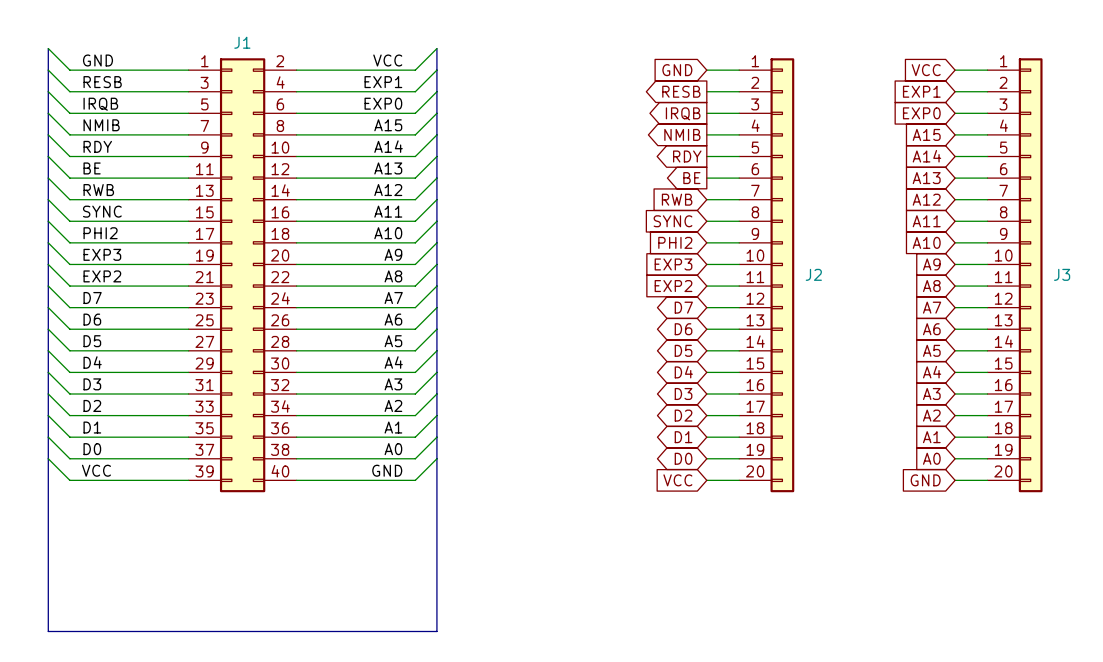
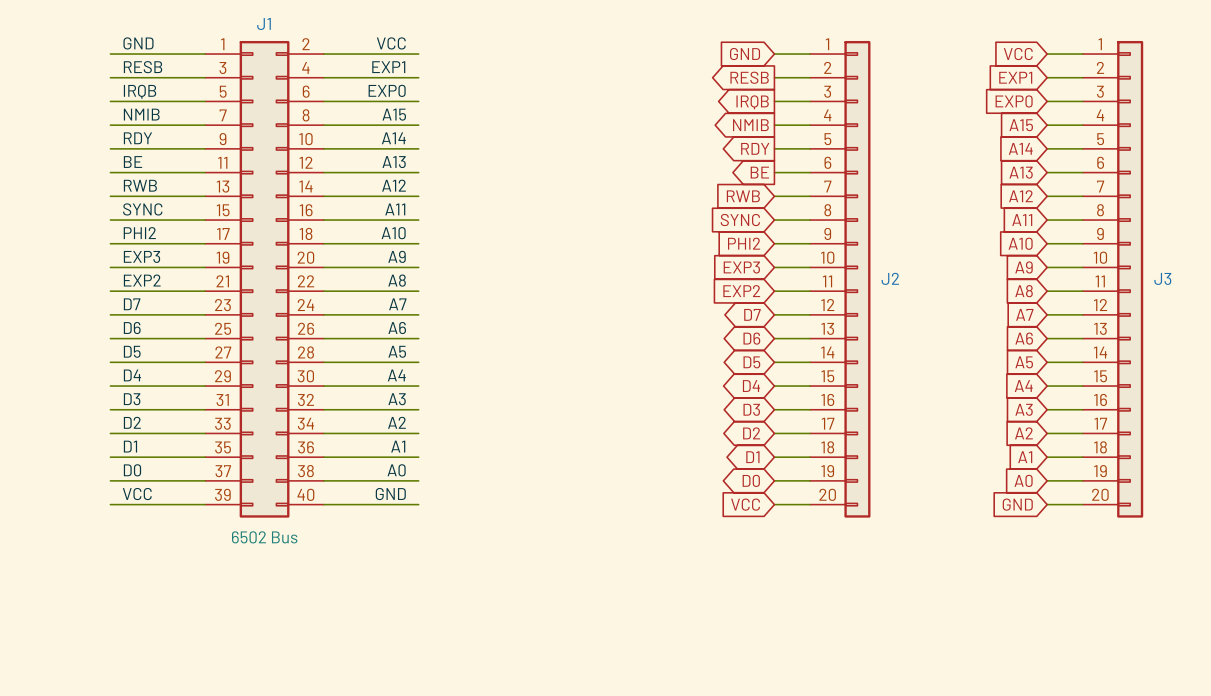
wire: (48, 48) (69, 70) (102, 70) -> none
bus: (48, 48) (48, 631) (436, 631) (436, 48) -> none
wire: (436, 48) (415, 70) (382, 70) -> none
label position: GND (97, 60) -> GND (138, 43)
label position: VCC (387, 60) -> VCC (391, 43)
wire: (48, 70) (69, 91) (102, 91) -> none
wire: (436, 70) (415, 91) (382, 91) -> none
label position: RESB (102, 82) -> RESB (143, 67)
label position: EXP1 (383, 82) -> EXP1 (388, 67)
wire: (48, 91) (69, 113) (102, 113) -> none
wire: (436, 91) (415, 113) (382, 113) -> none
label position: EXP0 (383, 103) -> EXP0 (387, 90)
label position: IRQB (100, 104) -> IRQB (140, 91)
wire: (48, 113) (69, 134) (102, 134) -> none
wire: (436, 113) (415, 134) (382, 134) -> none
label position: NMIB (101, 125) -> NMIB (141, 114)
label position: A15 (388, 125) -> A15 (394, 114)
wire: (48, 134) (69, 156) (102, 156) -> none
wire: (436, 134) (415, 156) (382, 156) -> none
label position: RDY (97, 146) -> RDY (137, 138)
label position: A14 (388, 146) -> A14 (393, 138)
wire: (48, 156) (69, 178) (102, 178) -> none
wire: (436, 156) (415, 178) (382, 178) -> none
label position: BE (92, 168) -> BE (133, 162)
label position: A13 (388, 168) -> A13 (394, 162)
wire: (48, 178) (69, 199) (102, 199) -> none
wire: (436, 178) (415, 199) (382, 199) -> none
label position: RWB (98, 190) -> RWB (140, 185)
label position: A12 (388, 190) -> A12 (393, 185)
wire: (48, 199) (69, 221) (102, 221) -> none
wire: (436, 199) (415, 221) (382, 221) -> none
label position: SYNC (102, 211) -> SYNC (142, 209)
label position: A11 (388, 211) -> A11 (395, 209)
wire: (48, 221) (69, 242) (102, 242) -> none
wire: (436, 221) (415, 242) (382, 242) -> none
label position: PHI2 (100, 233) -> PHI2 (139, 233)
label position: A10 (388, 233) -> A10 (393, 233)
wire: (48, 242) (69, 264) (102, 264) -> none
wire: (436, 242) (415, 264) (382, 264) -> none
label position: EXP3 (102, 254) -> EXP3 (141, 256)
label position: A9 (393, 254) -> A9 (397, 256)
wire: (48, 264) (69, 286) (102, 286) -> none
wire: (436, 264) (415, 286) (382, 286) -> none
label position: EXP2 (102, 276) -> EXP2 (142, 280)
label position: A8 (393, 276) -> A8 (397, 280)
wire: (48, 286) (69, 307) (102, 307) -> none
wire: (436, 286) (415, 307) (382, 307) -> none
label position: D7 (92, 298) -> D7 (132, 304)
label position: A7 (393, 298) -> A7 (397, 304)
wire: (48, 307) (69, 329) (102, 329) -> none
wire: (436, 307) (415, 329) (382, 329) -> none
label position: D6 (92, 319) -> D6 (132, 328)
label position: A6 (393, 319) -> A6 (397, 328)
wire: (48, 329) (69, 350) (102, 350) -> none
wire: (436, 329) (415, 350) (382, 350) -> none
label position: D5 (92, 341) -> D5 (132, 351)
label position: A5 (393, 341) -> A5 (397, 351)
wire: (48, 350) (69, 372) (102, 372) -> none
wire: (436, 350) (415, 372) (382, 372) -> none
label position: D4 (92, 362) -> D4 (132, 375)
label position: A4 (393, 362) -> A4 (396, 375)
wire: (48, 372) (69, 394) (102, 394) -> none
wire: (436, 372) (415, 394) (382, 394) -> none
label position: D3 (92, 384) -> D3 (132, 399)
label position: A3 (393, 384) -> A3 (397, 399)
wire: (48, 394) (69, 415) (102, 415) -> none
wire: (436, 394) (415, 415) (382, 415) -> none
label position: D2 (92, 405) -> D2 (132, 422)
label position: A2 (393, 405) -> A2 (396, 422)
wire: (48, 415) (69, 437) (102, 437) -> none
wire: (436, 415) (415, 437) (382, 437) -> none
label position: D1 (92, 427) -> D1 (130, 446)
label position: A1 (393, 427) -> A1 (398, 446)
wire: (48, 437) (69, 458) (102, 458) -> none
wire: (436, 437) (415, 458) (382, 458) -> none
label position: D0 (92, 449) -> D0 (132, 470)
label position: A0 (393, 449) -> A0 (396, 470)
wire: (48, 458) (69, 480) (102, 480) -> none
wire: (436, 458) (415, 480) (382, 480) -> none
label position: VCC (96, 470) -> VCC (137, 494)
label position: GND (387, 470) -> GND (390, 494)
J1 value: none -> 6502 Bus (264, 537)

